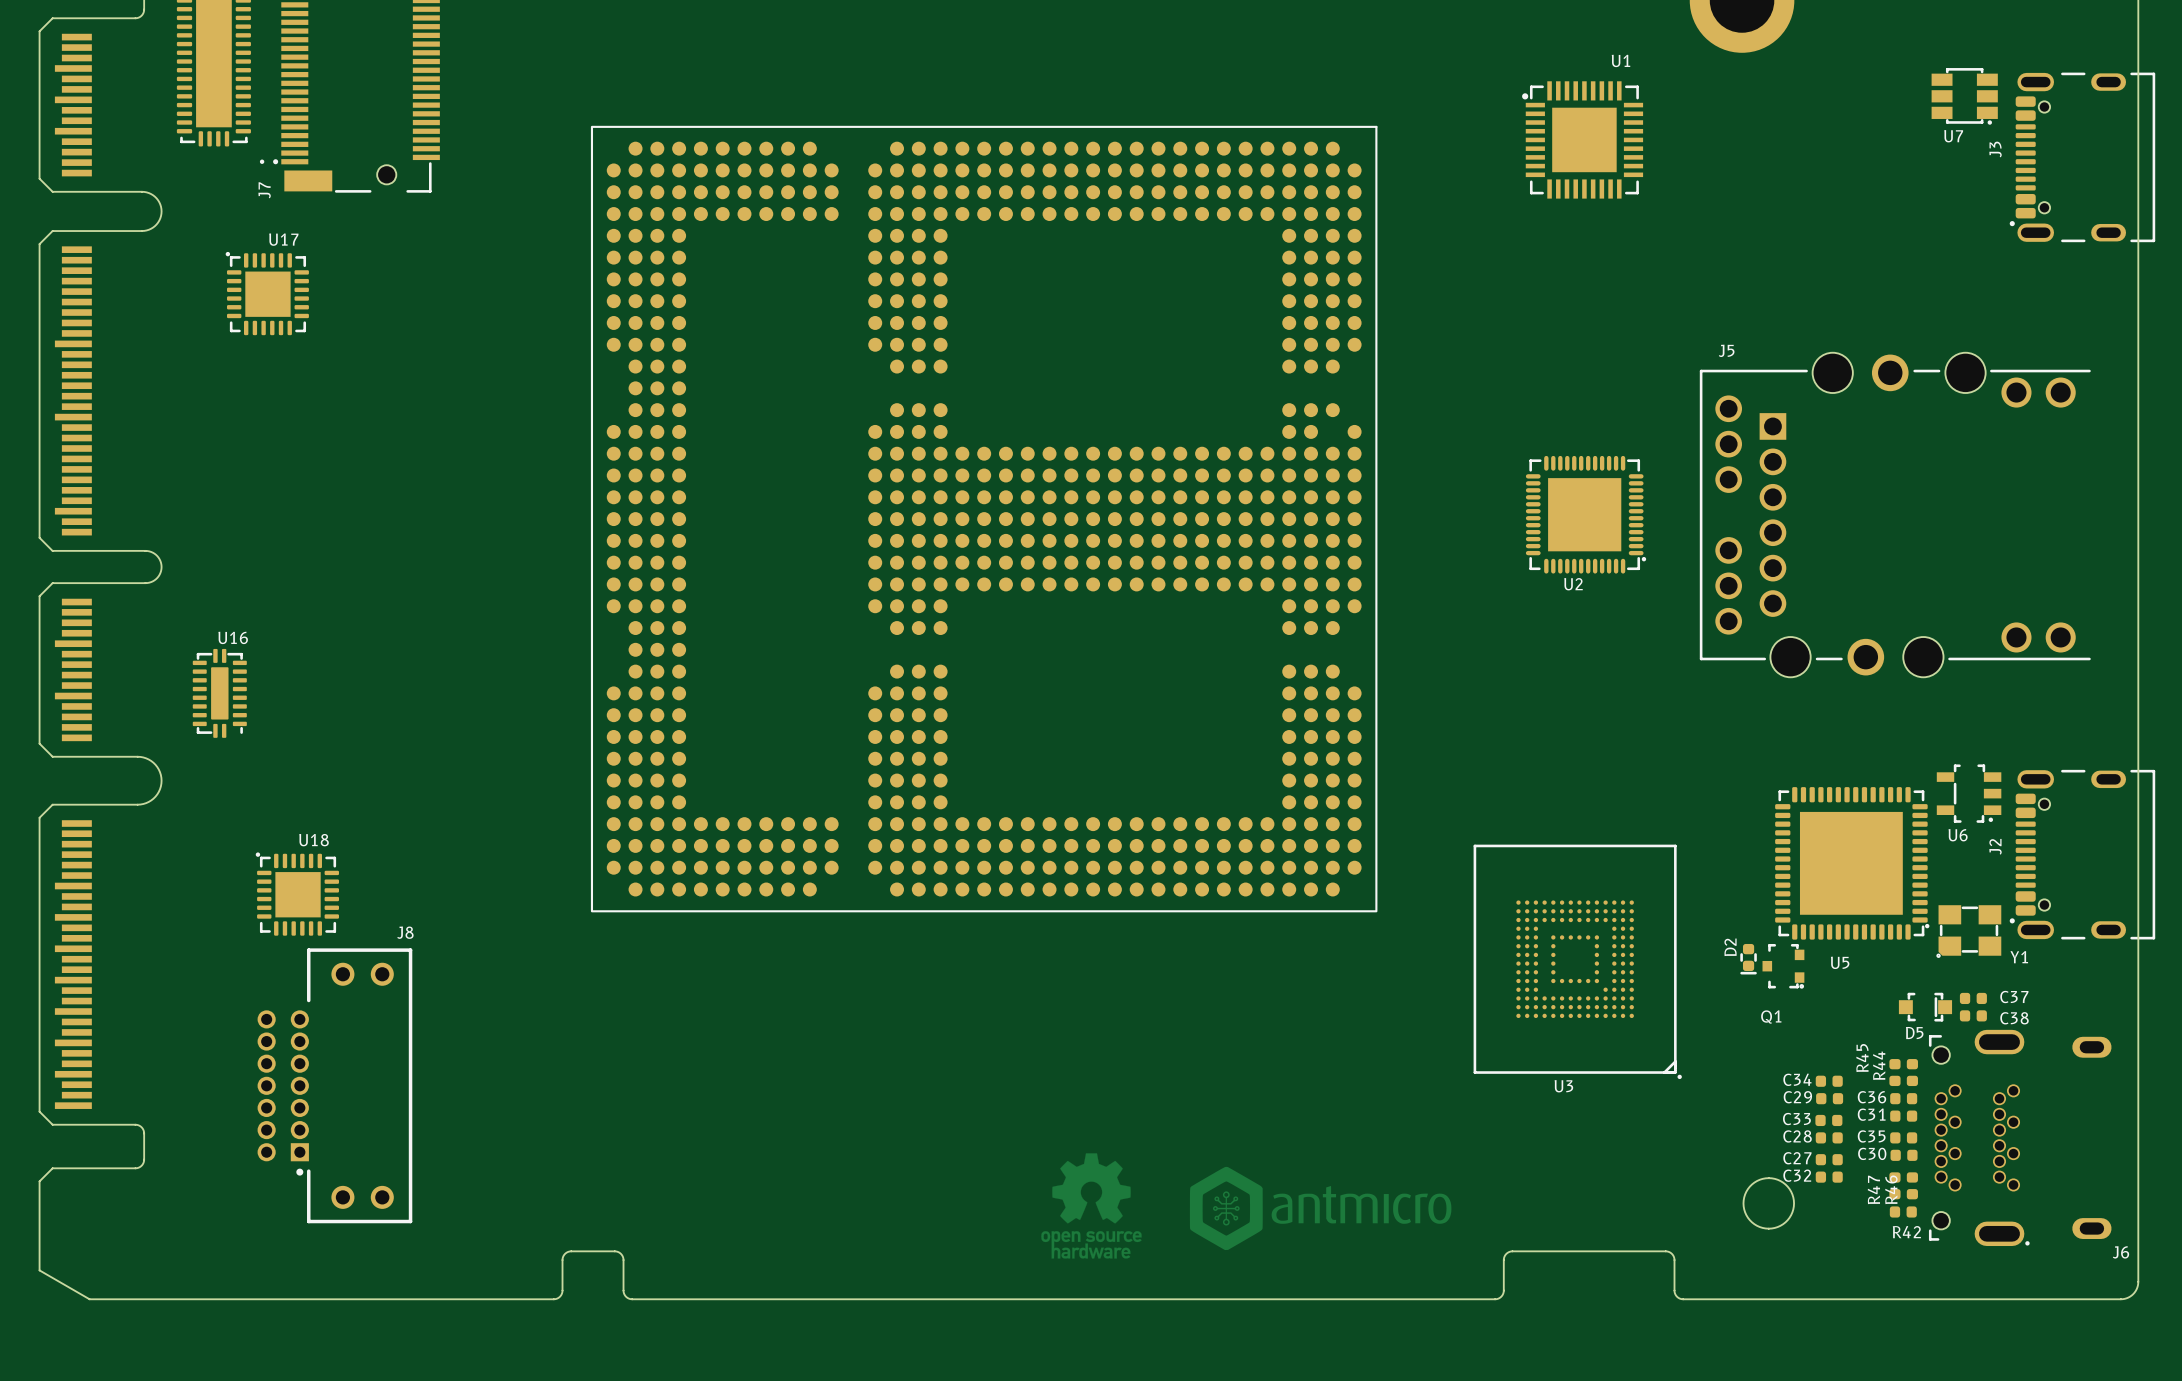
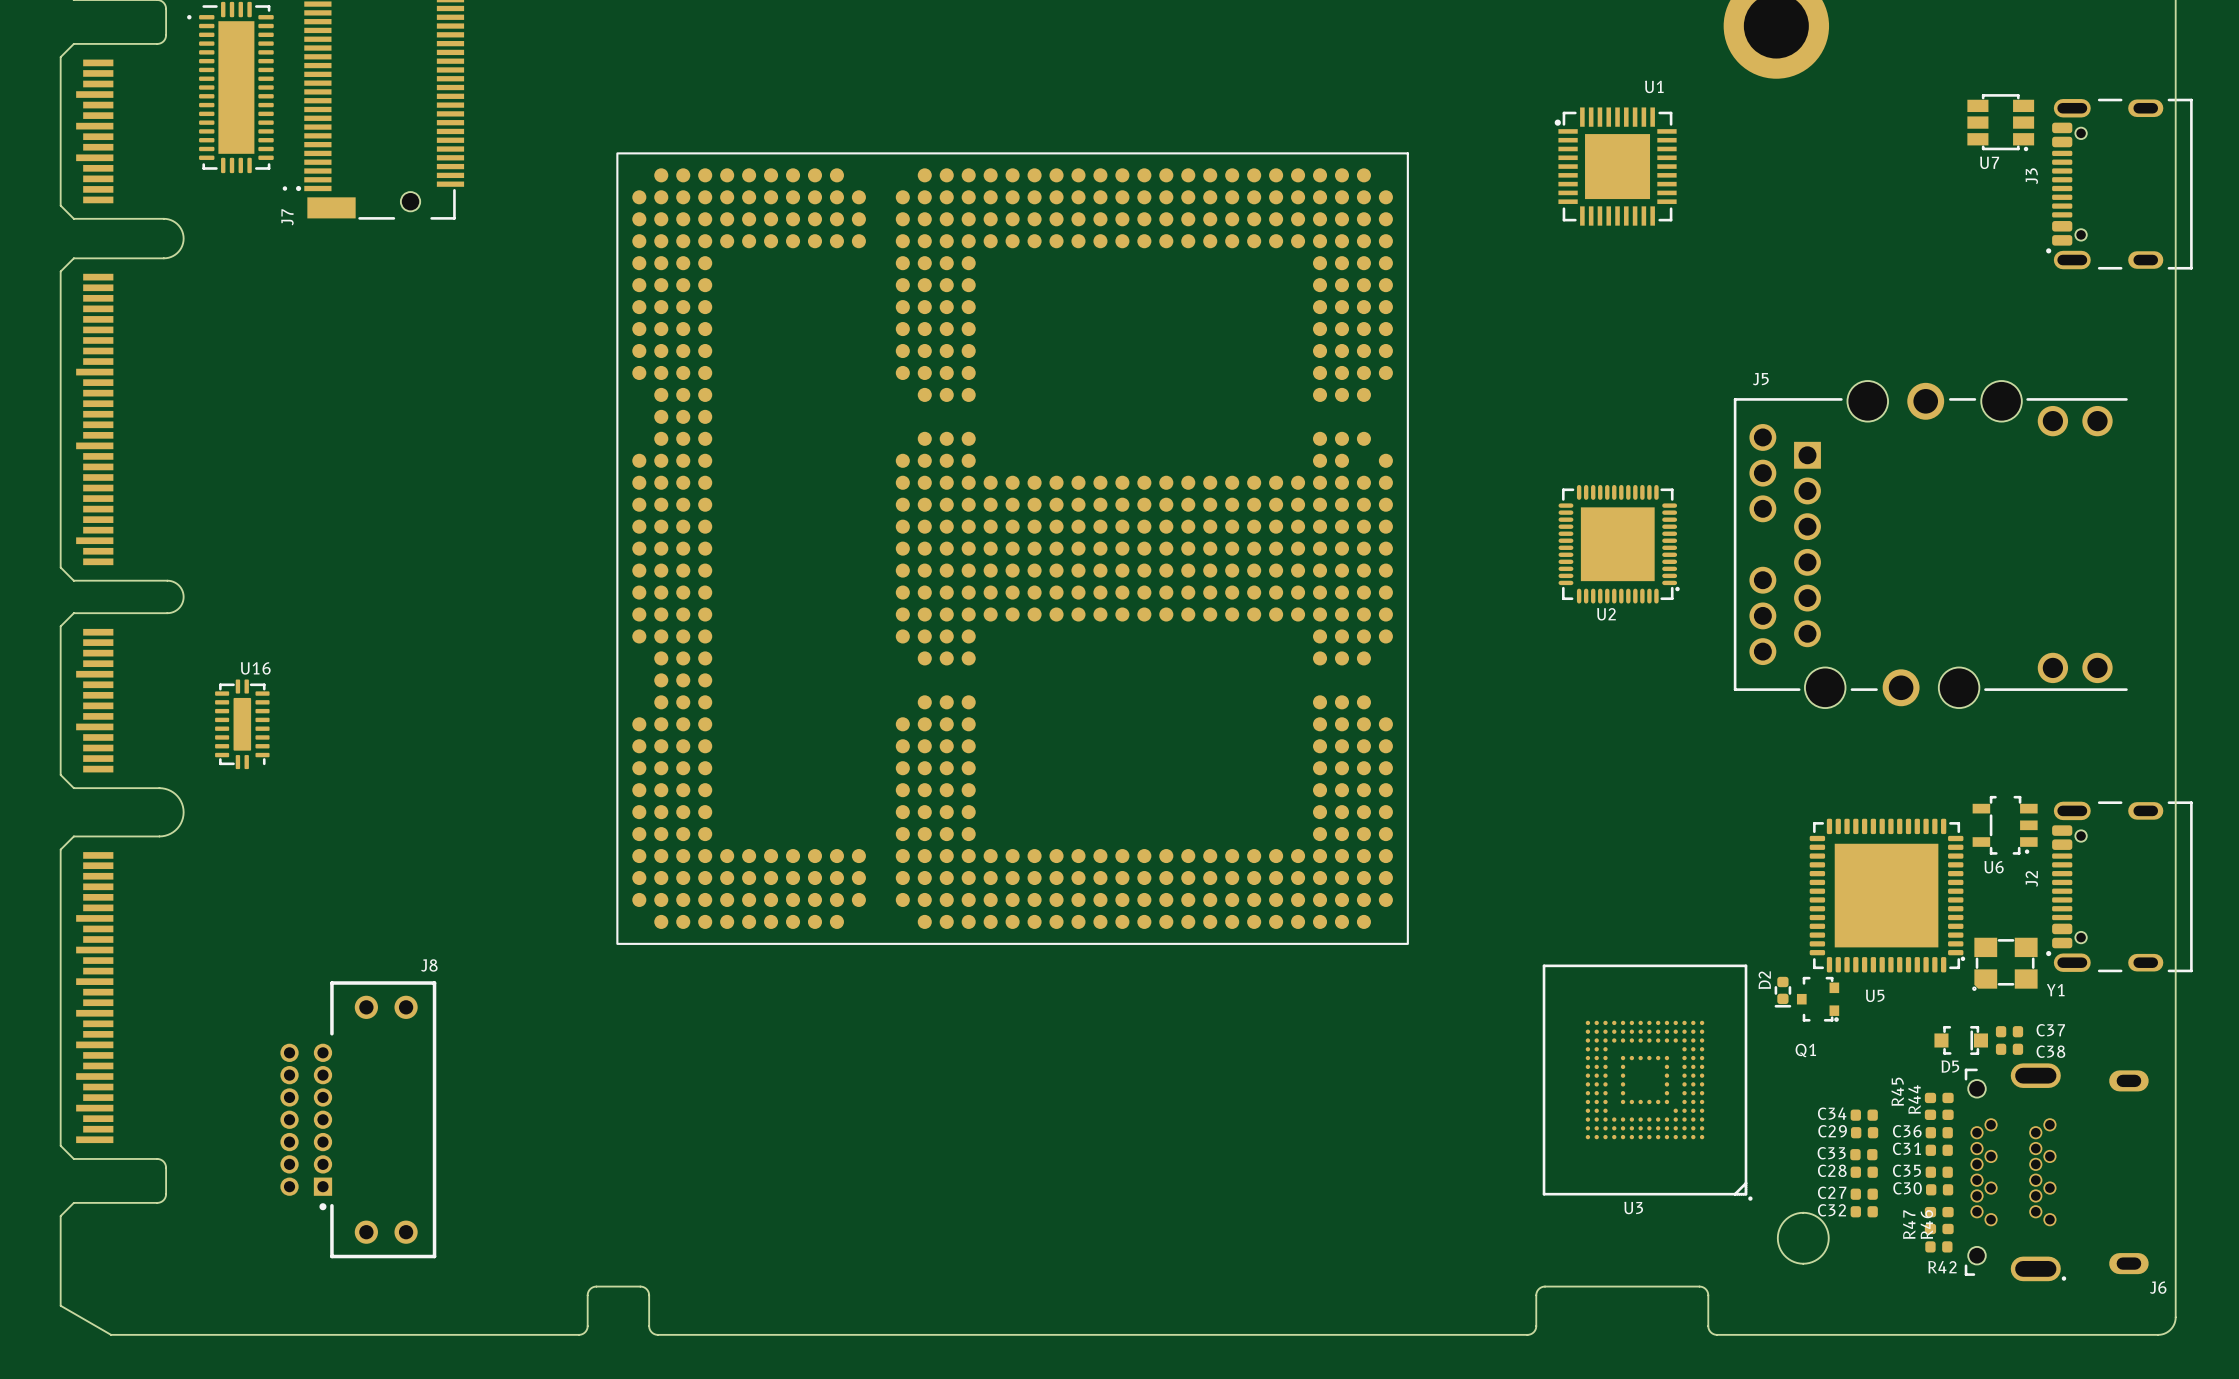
U17: (267, 293) -> none
U18: (297, 894) -> none
U3 position: (1577, 961) -> (1647, 1082)
drawing: [1041, 1153, 1142, 1259] -> none
drawing: [1189, 1166, 1452, 1251] -> none

